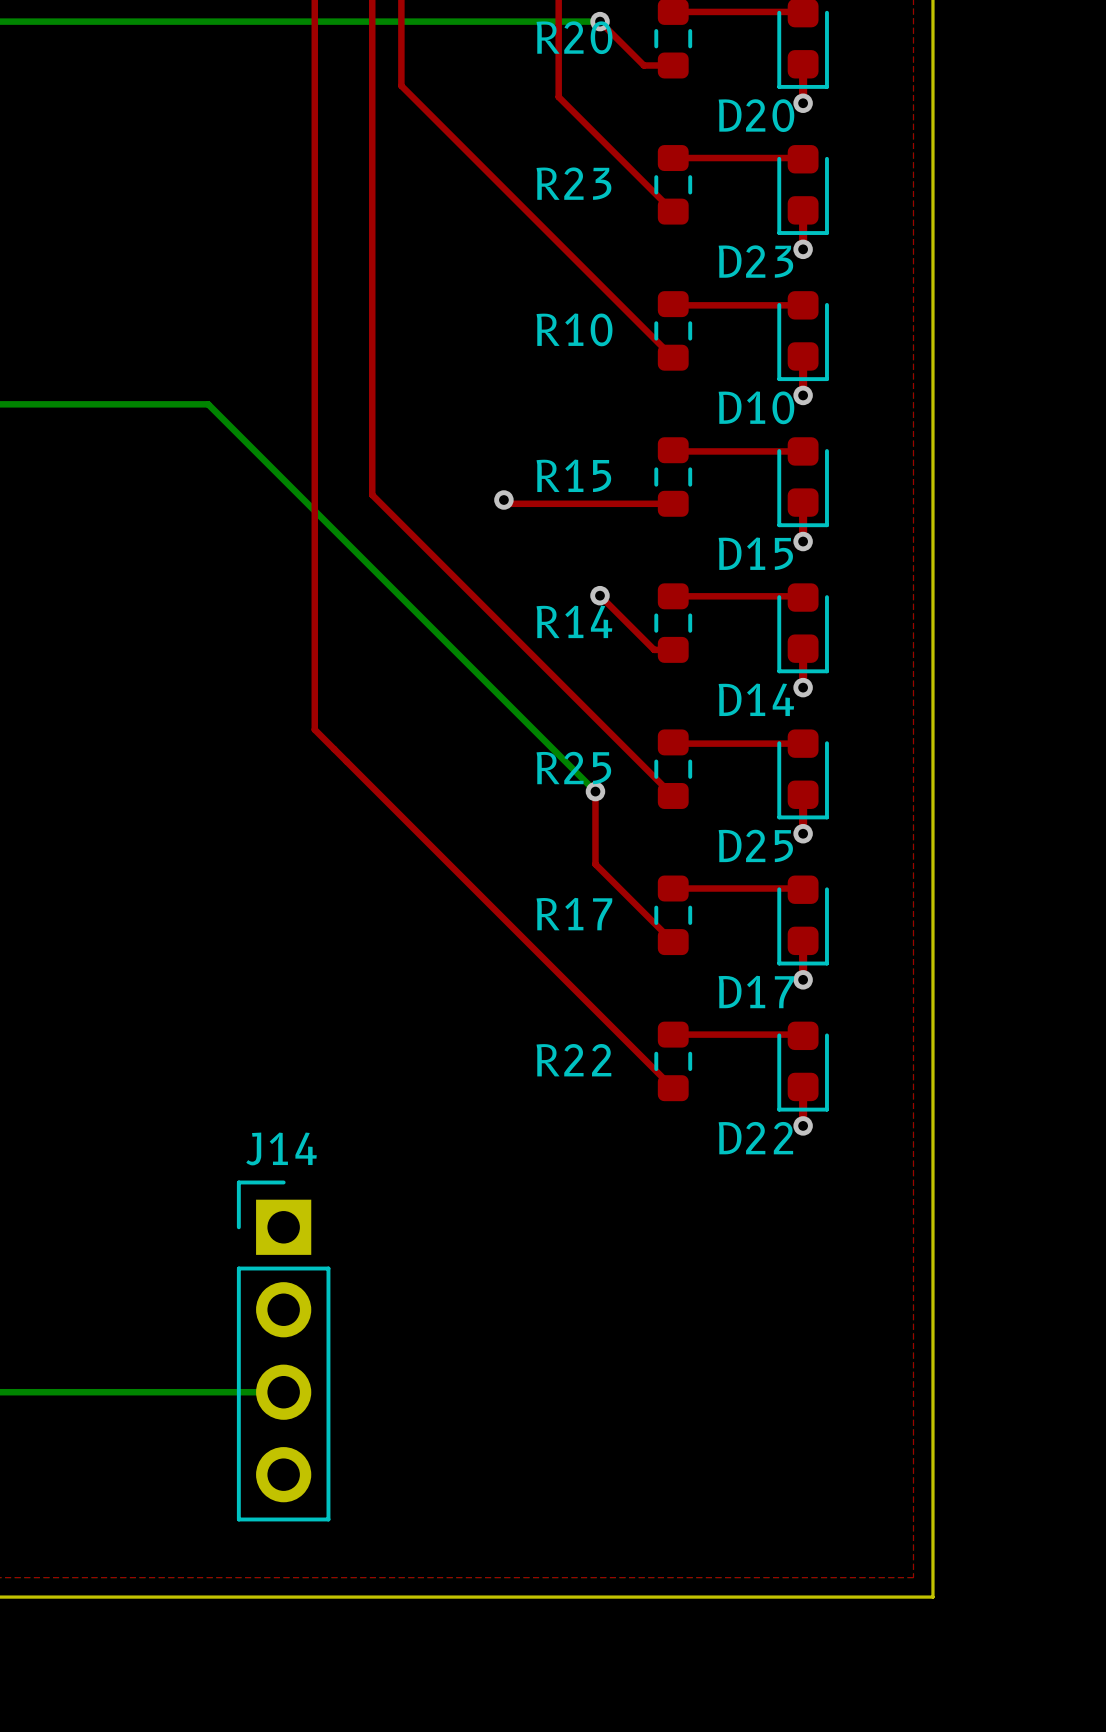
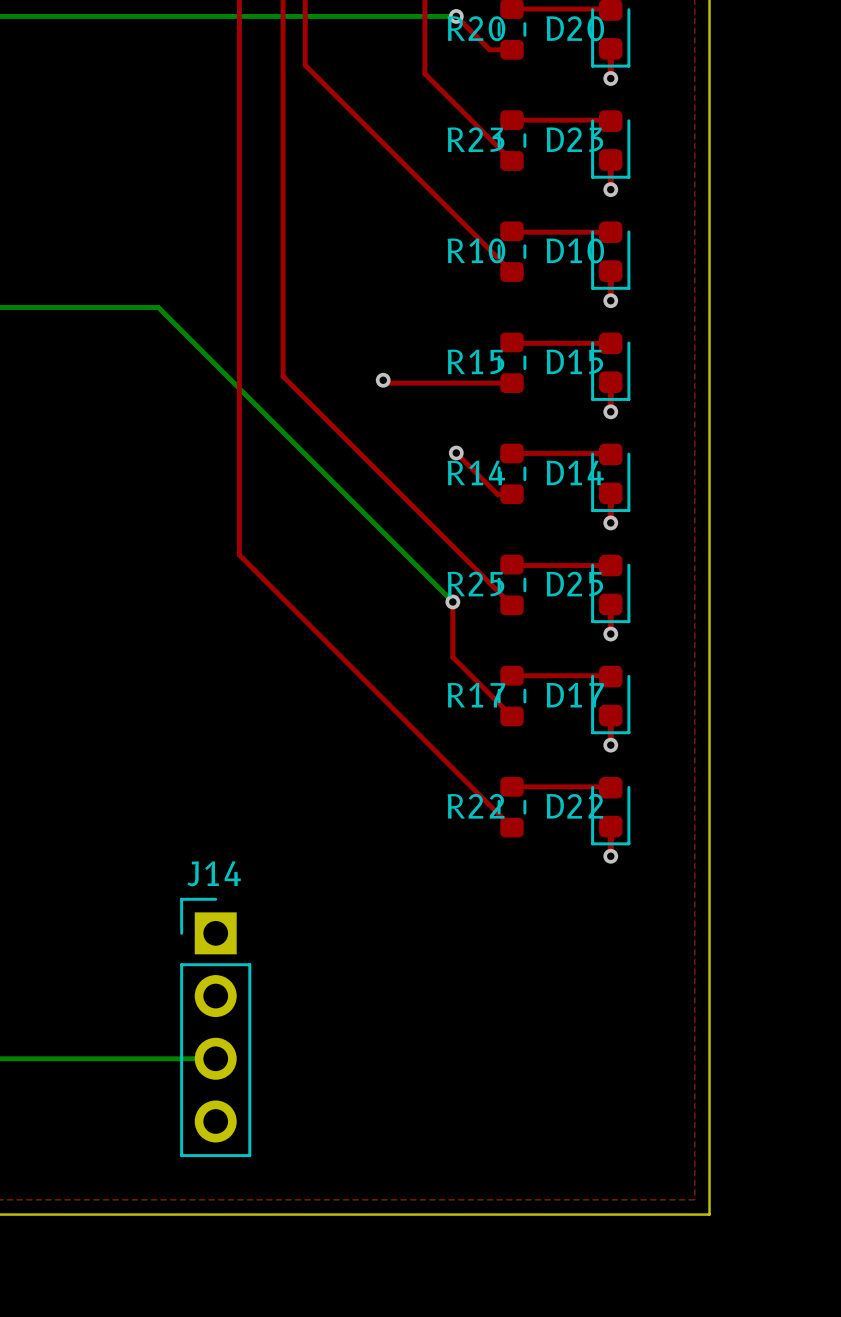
R20 name position: R20 (574, 37) -> R20 (476, 28)
D20 name position: D20 (756, 115) -> D20 (575, 28)
R23 name position: R23 (573, 183) -> R23 (475, 139)
D23 name position: D23 (755, 261) -> D23 (574, 139)
R10 name position: R10 (574, 329) -> R10 (476, 250)
D10 name position: D10 (756, 407) -> D10 (575, 250)
R15 name position: R15 (573, 475) -> R15 (475, 361)
D15 name position: D15 (755, 553) -> D15 (574, 361)
R14 name position: R14 (574, 621) -> R14 (476, 472)
D14 name position: D14 (756, 699) -> D14 (575, 472)
R25 name position: R25 (573, 768) -> R25 (475, 584)
D25 name position: D25 (755, 845) -> D25 (574, 584)
R17 name position: R17 (574, 914) -> R17 (476, 695)
D17 name position: D17 (756, 992) -> D17 (575, 695)
R22 name position: R22 (573, 1060) -> R22 (475, 806)
D22 name position: D22 (755, 1138) -> D22 (574, 806)

